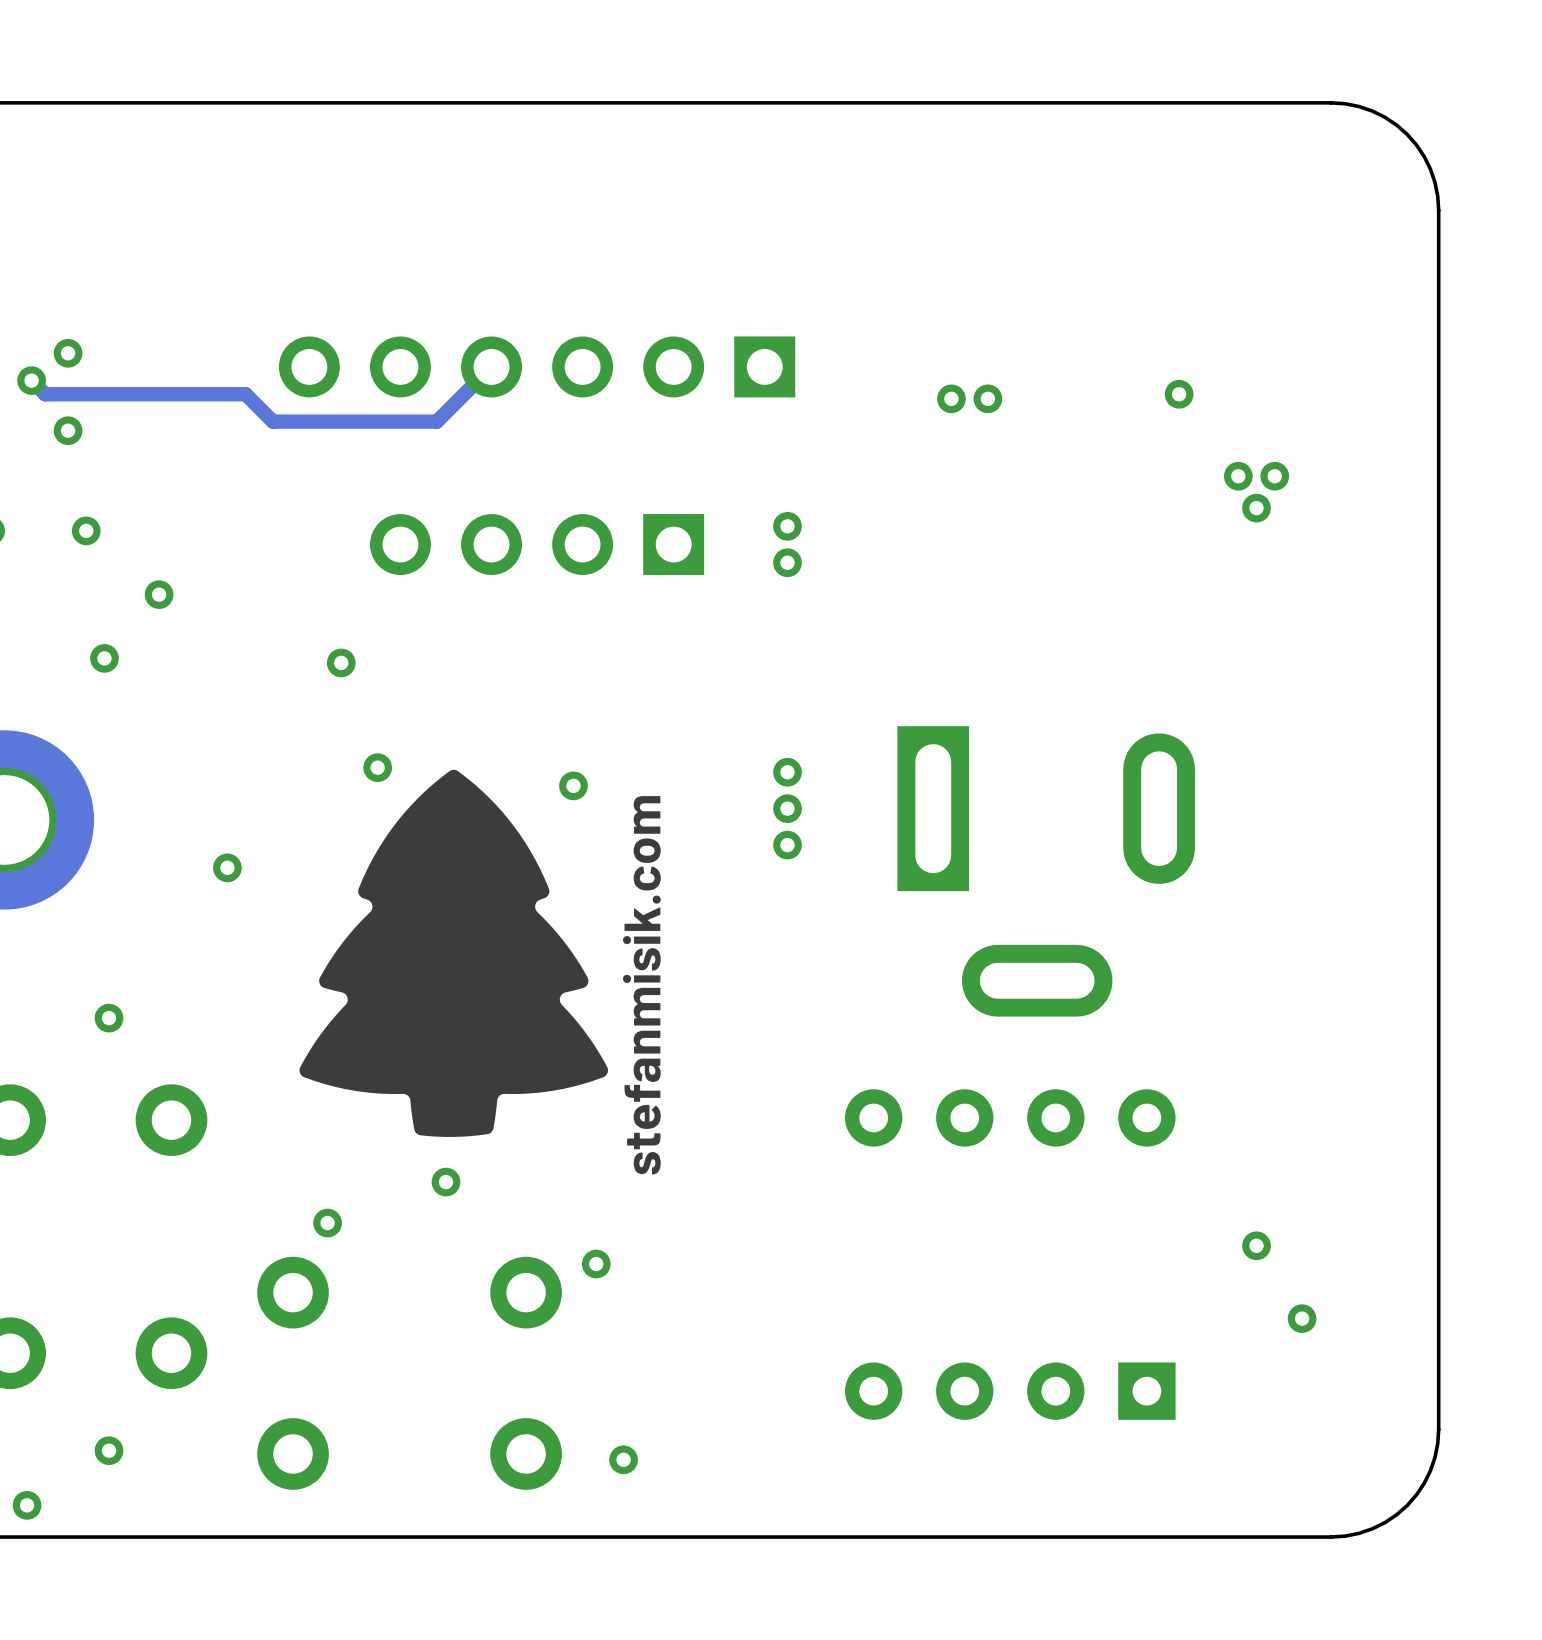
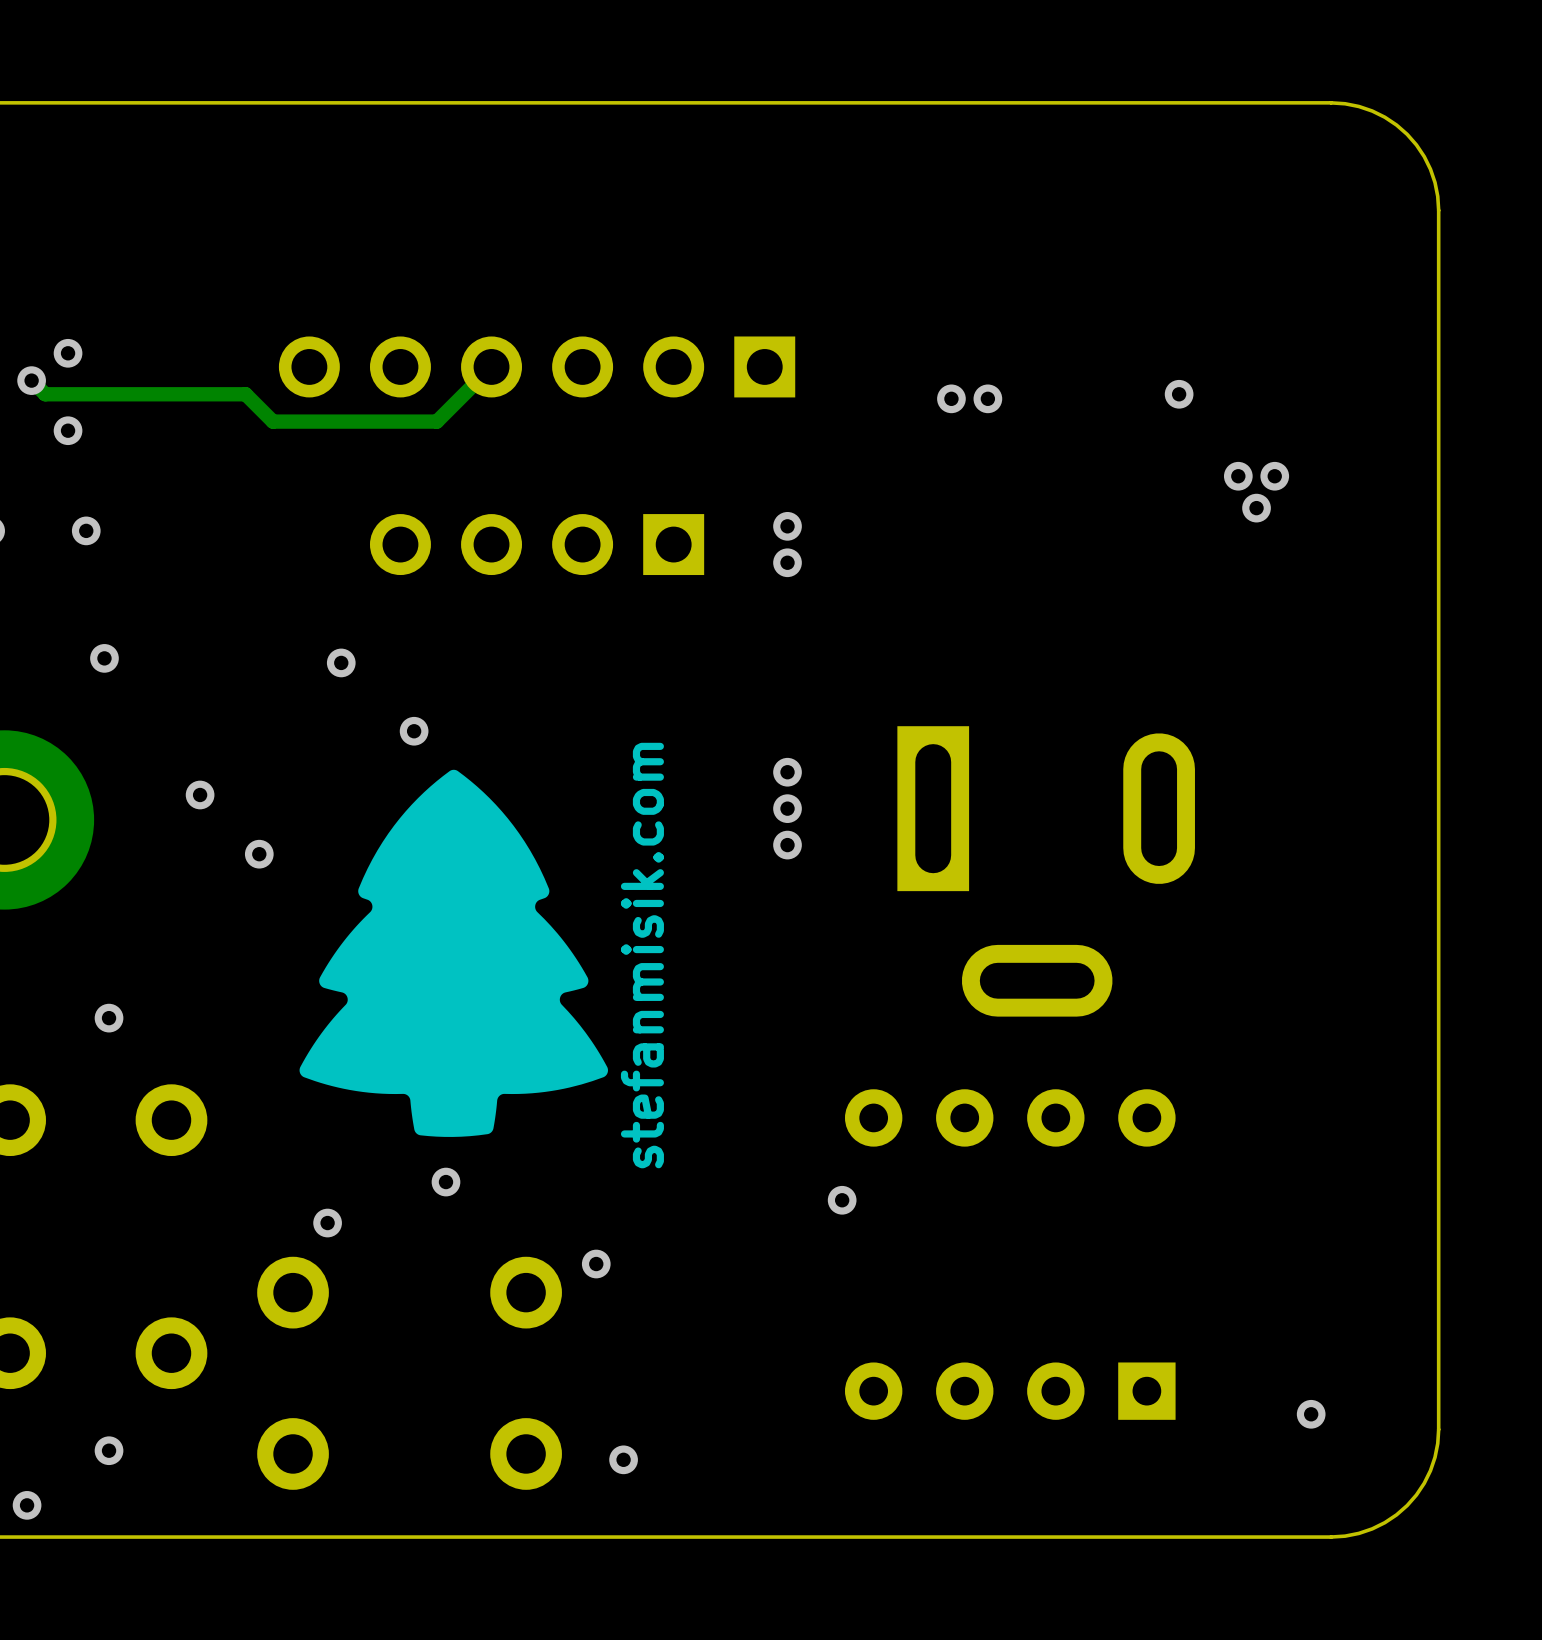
via: (159, 594) -> none
via position: (377, 767) -> (414, 731)
via: (573, 785) -> none
via: none -> (200, 794)
via position: (227, 867) -> (259, 854)
via: none -> (842, 1200)
via: (1256, 1245) -> none
via: (1302, 1318) -> none
via: none -> (1311, 1414)

